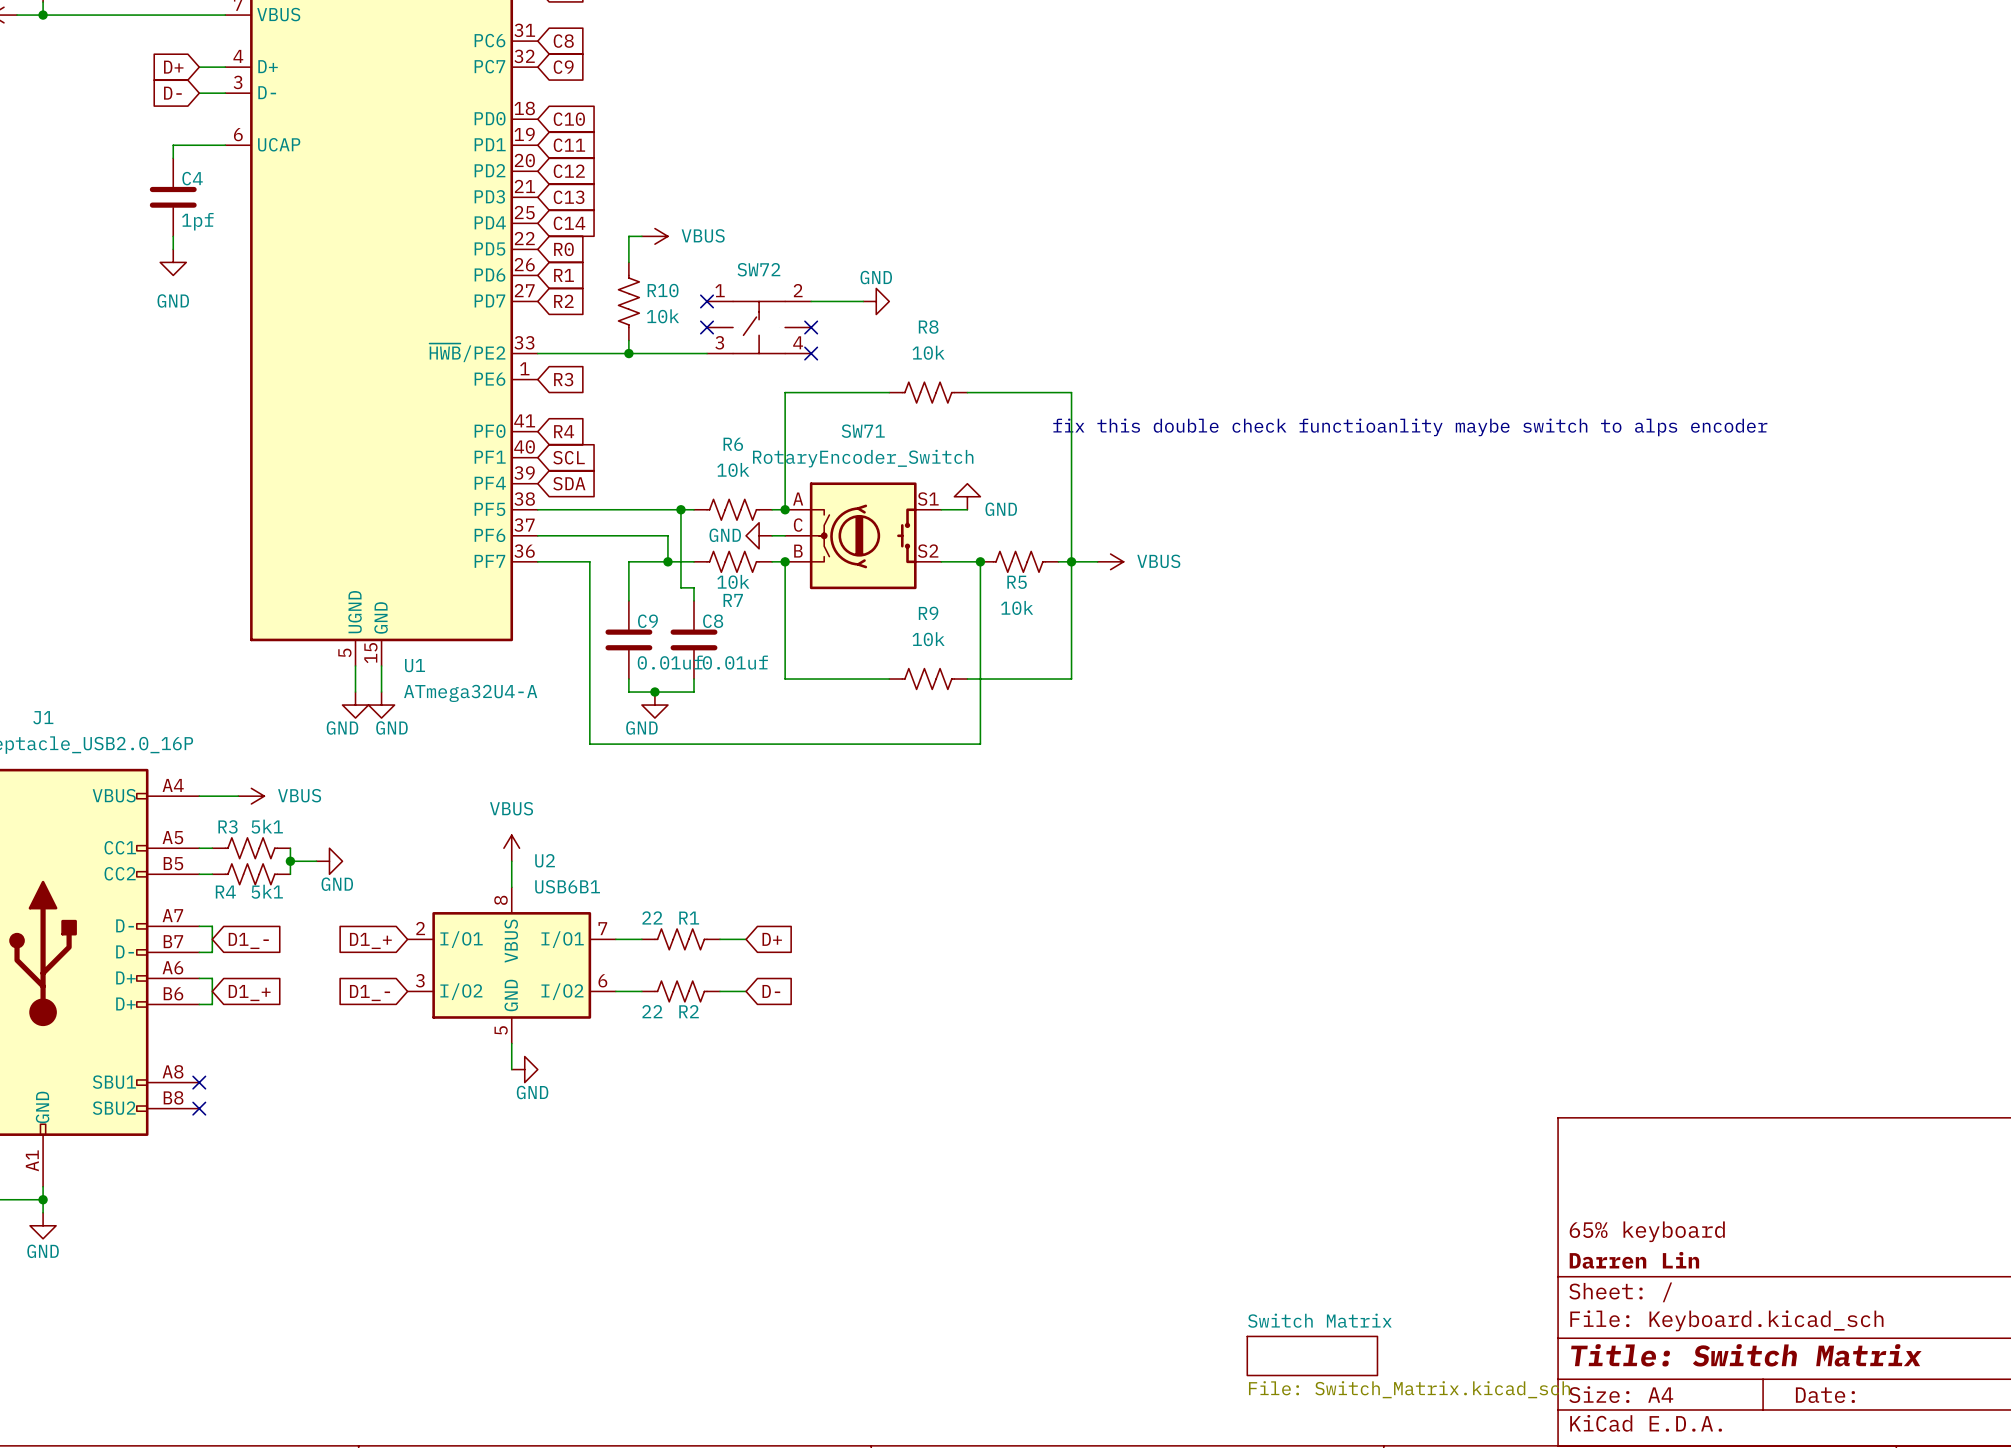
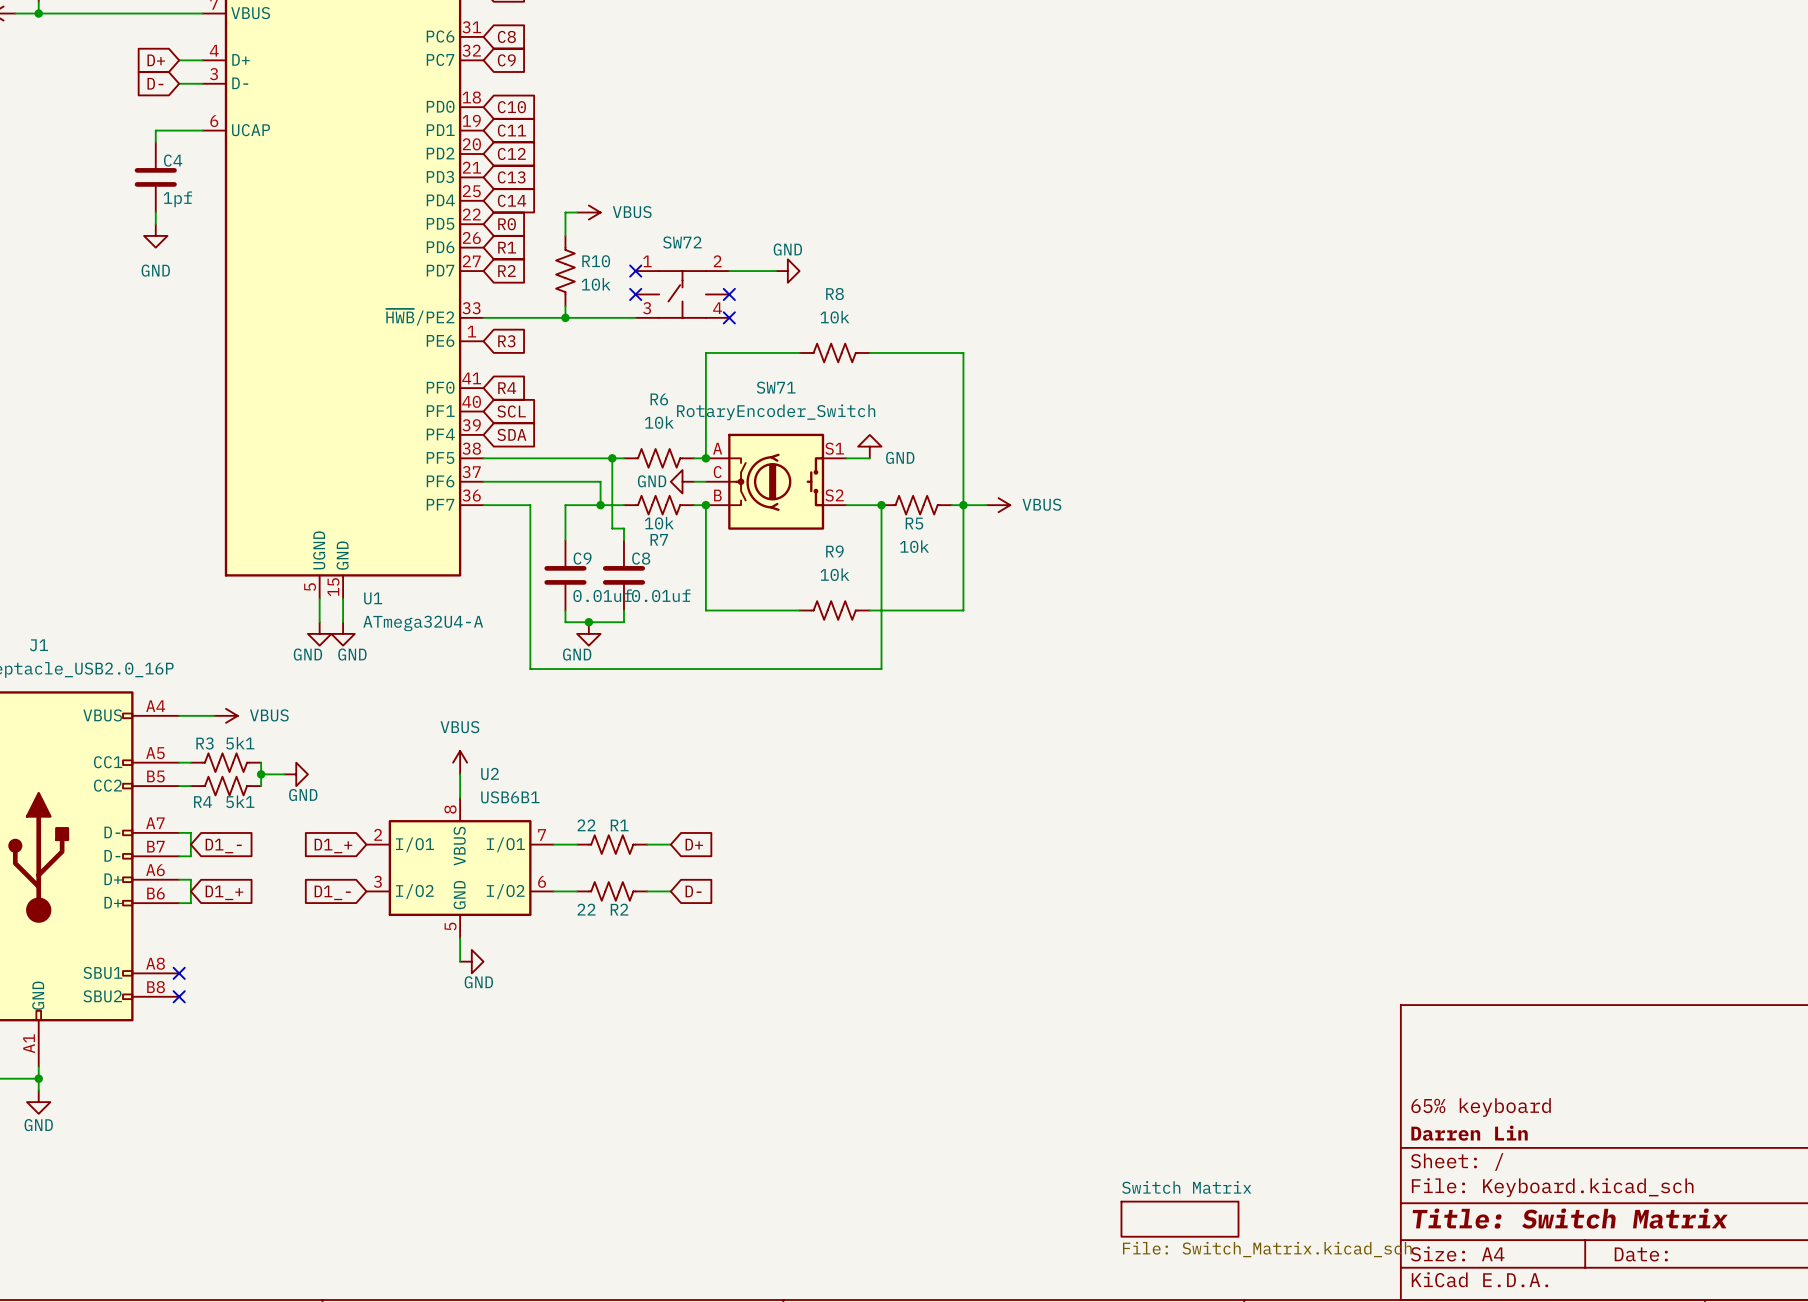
text: fix this double check functioanlity maybe switch to alps encoder (1410, 427) -> none

